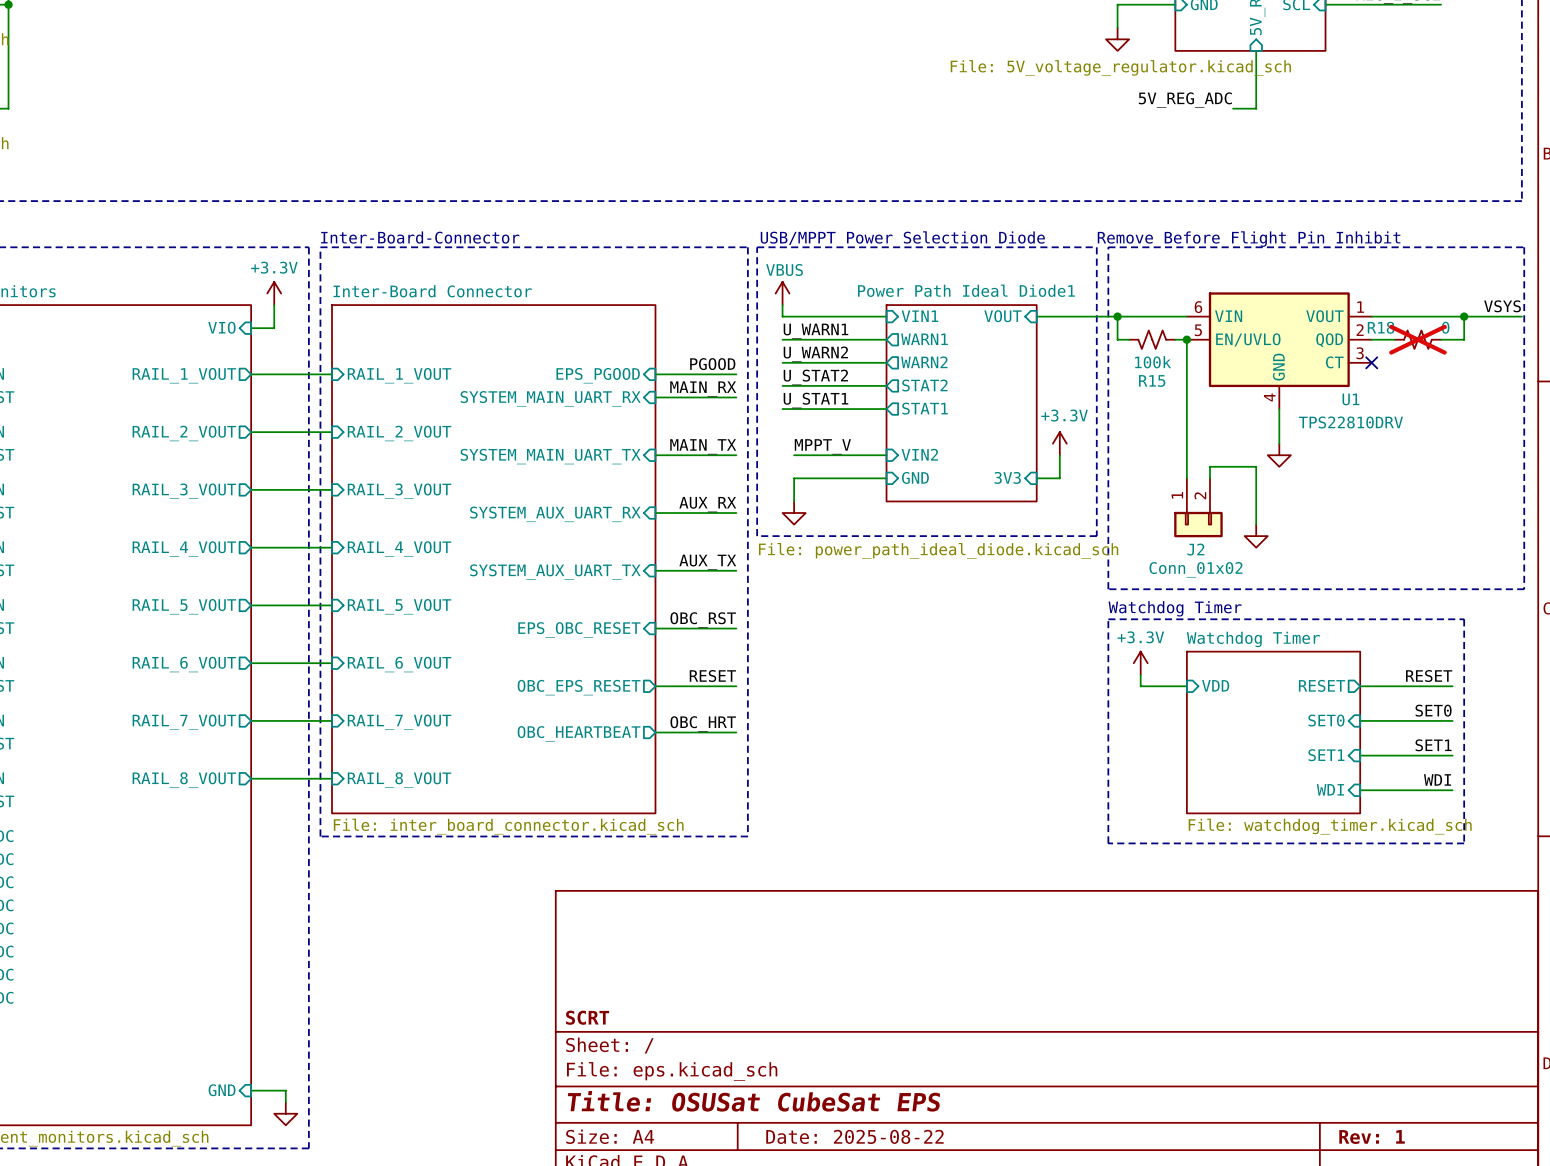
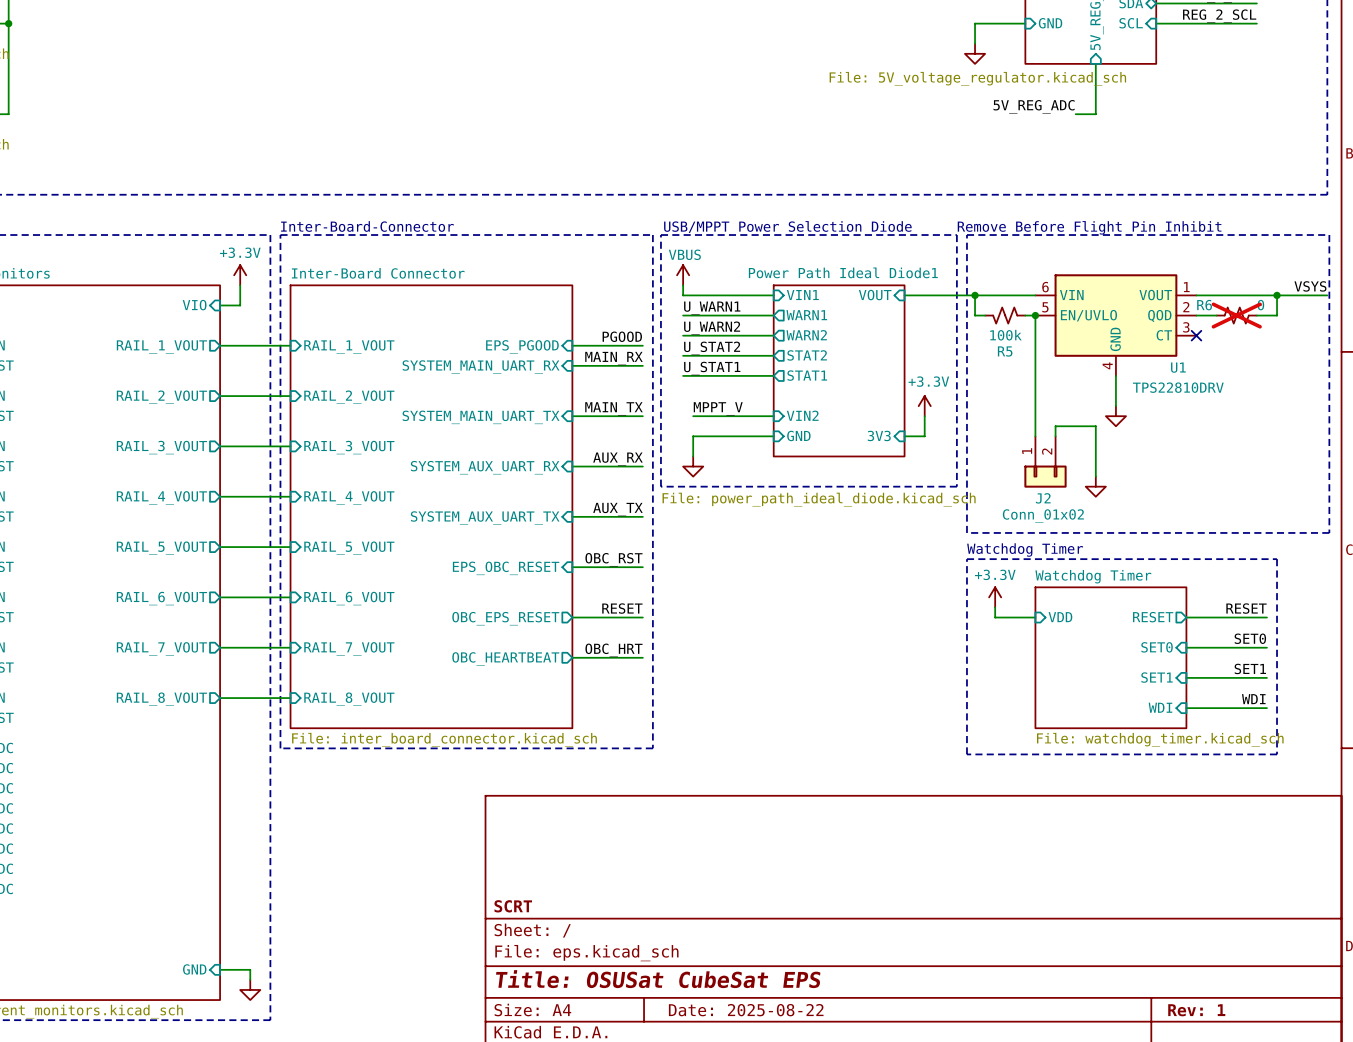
R18 name: R18 (1381, 327) -> R6 (1204, 305)
R15 name: R15 (1152, 380) -> R5 (1005, 351)

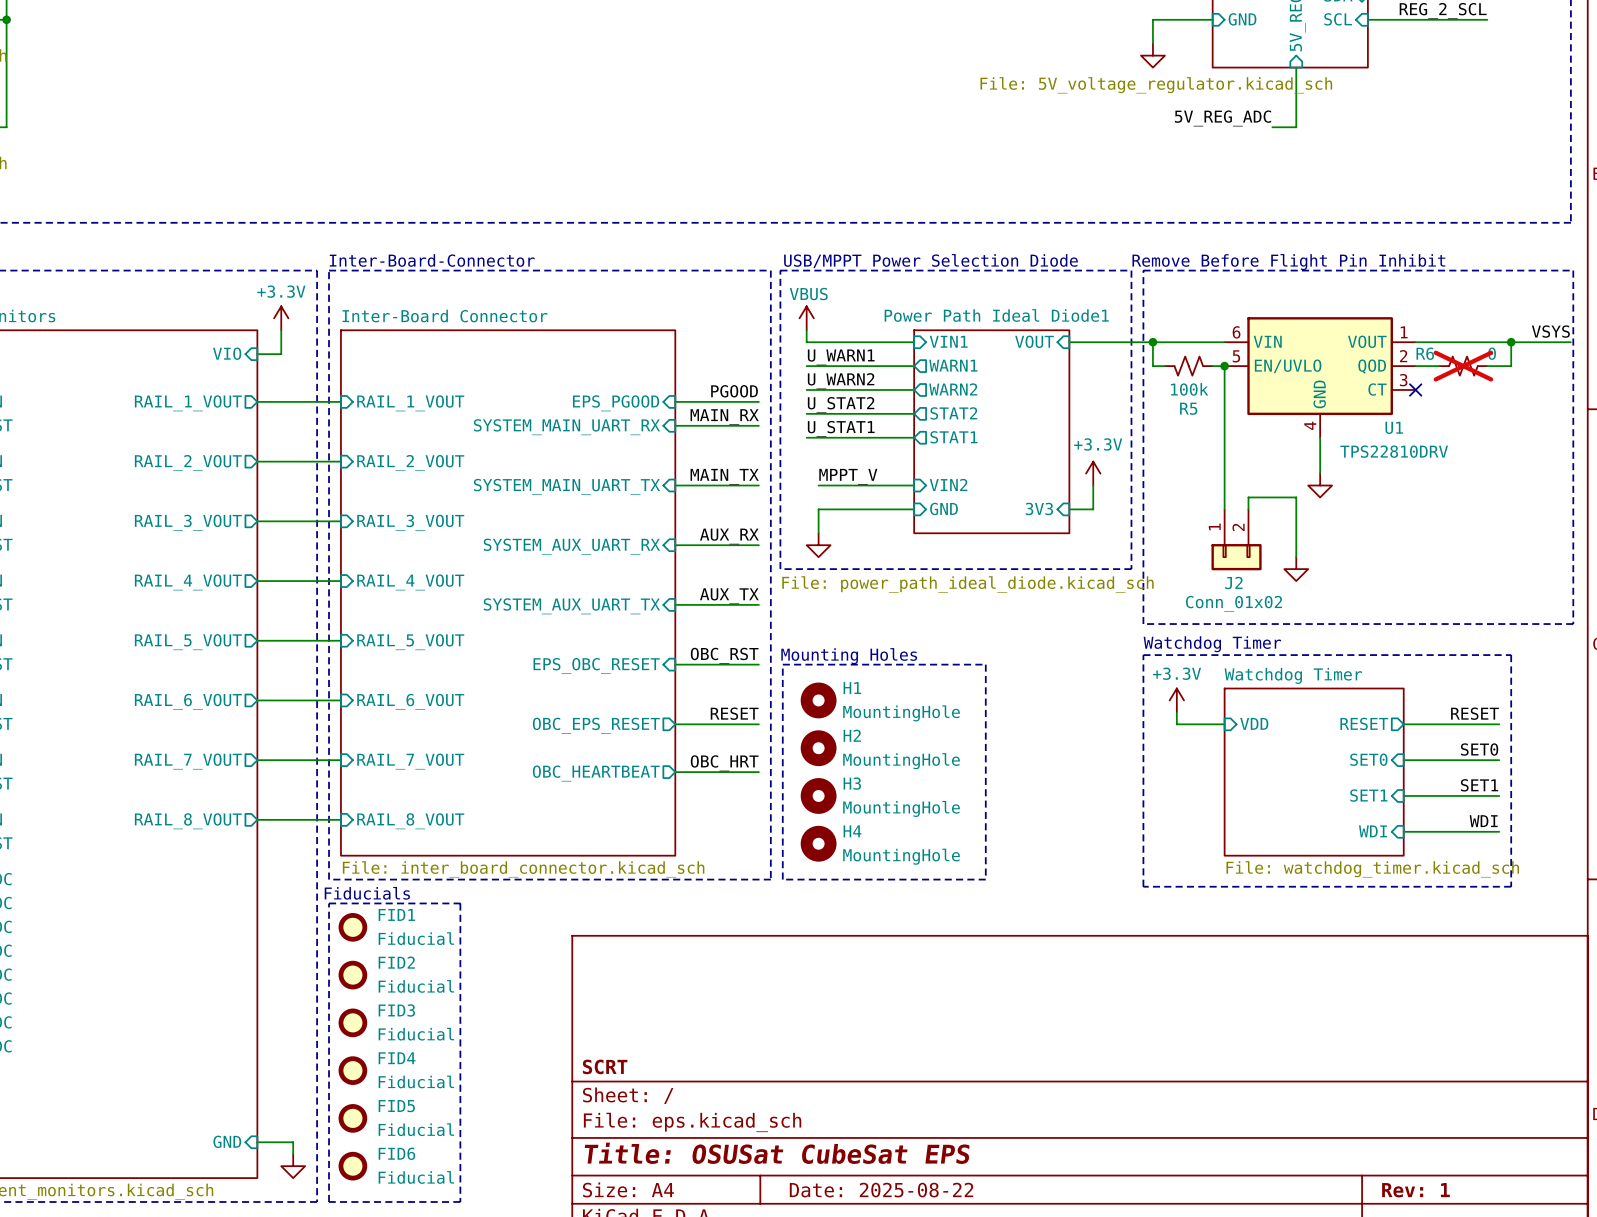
text: none -> Mounting Holes (849, 656)
line: none -> (782, 664) (985, 664) (985, 879) (782, 879) (782, 664)
H1: none -> MountingHole (818, 700)
H2: none -> MountingHole (818, 748)
H3: none -> MountingHole (818, 795)
H4: none -> MountingHole (818, 843)
text: none -> Fiducials (367, 893)
line: none -> (329, 903) (329, 1201) (460, 1201) (460, 903) (329, 903)
FID1: none -> Fiducial (352, 927)
FID2: none -> Fiducial (352, 975)
FID3: none -> Fiducial (352, 1022)
FID4: none -> Fiducial (352, 1070)
FID5: none -> Fiducial (352, 1118)
FID6: none -> Fiducial (352, 1166)

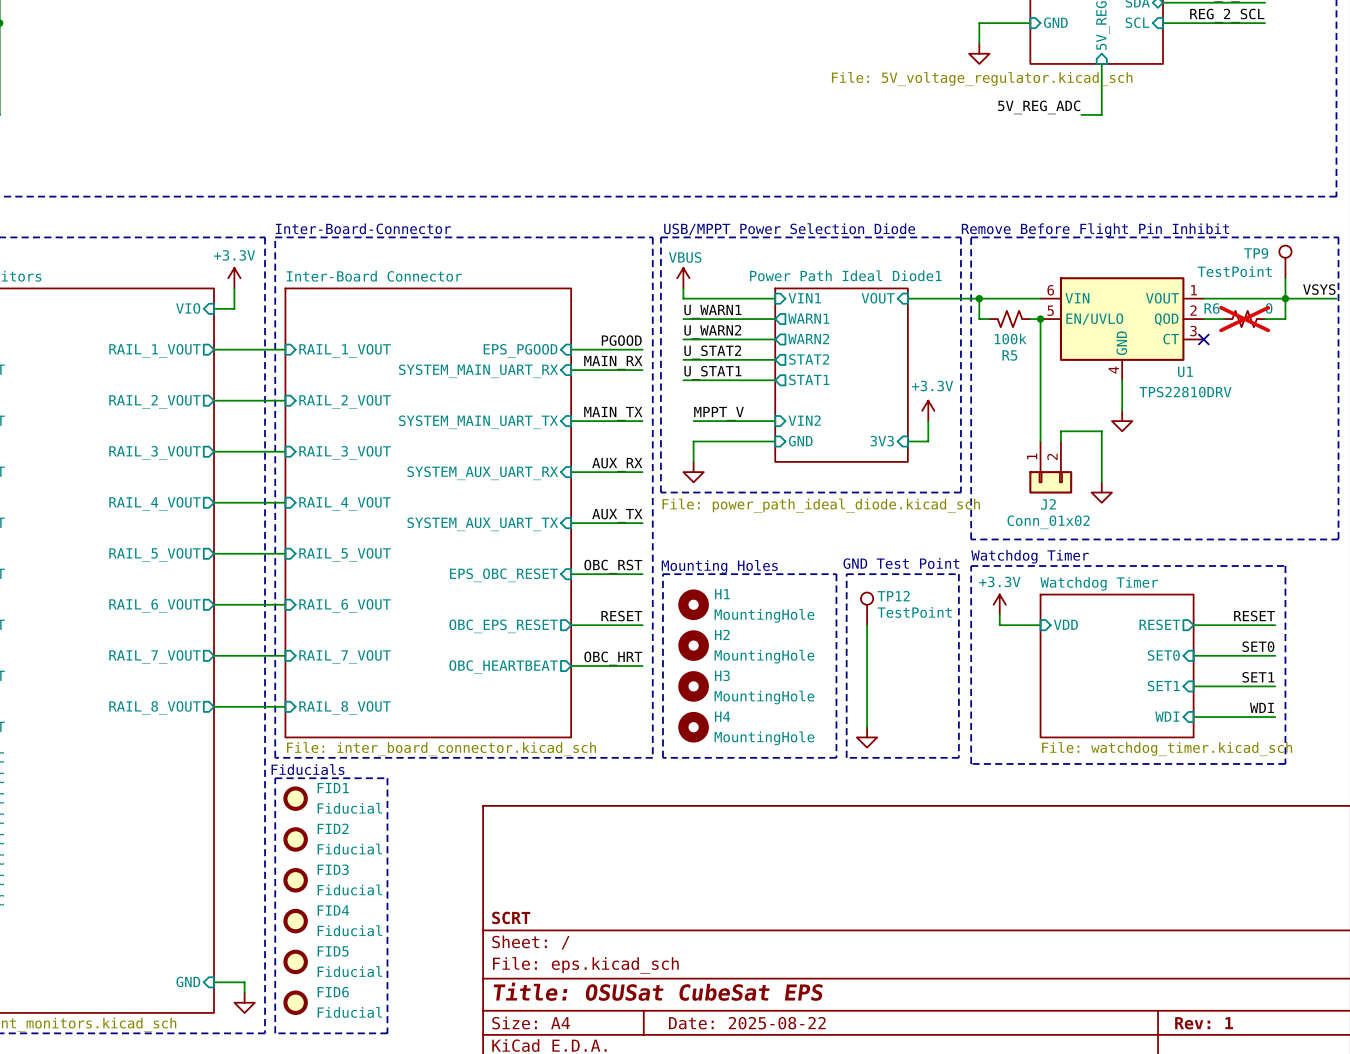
TP9: none -> TestPoint (1285, 261)
wire: none -> (1285, 278) (1285, 298)
text: none -> GND Test Point (901, 563)
line: none -> (846, 574) (958, 574) (958, 757) (846, 757) (846, 574)
TP12: none -> TestPoint (867, 608)
wire: none -> (867, 625) (867, 727)
power symbol: none -> (867, 737)

